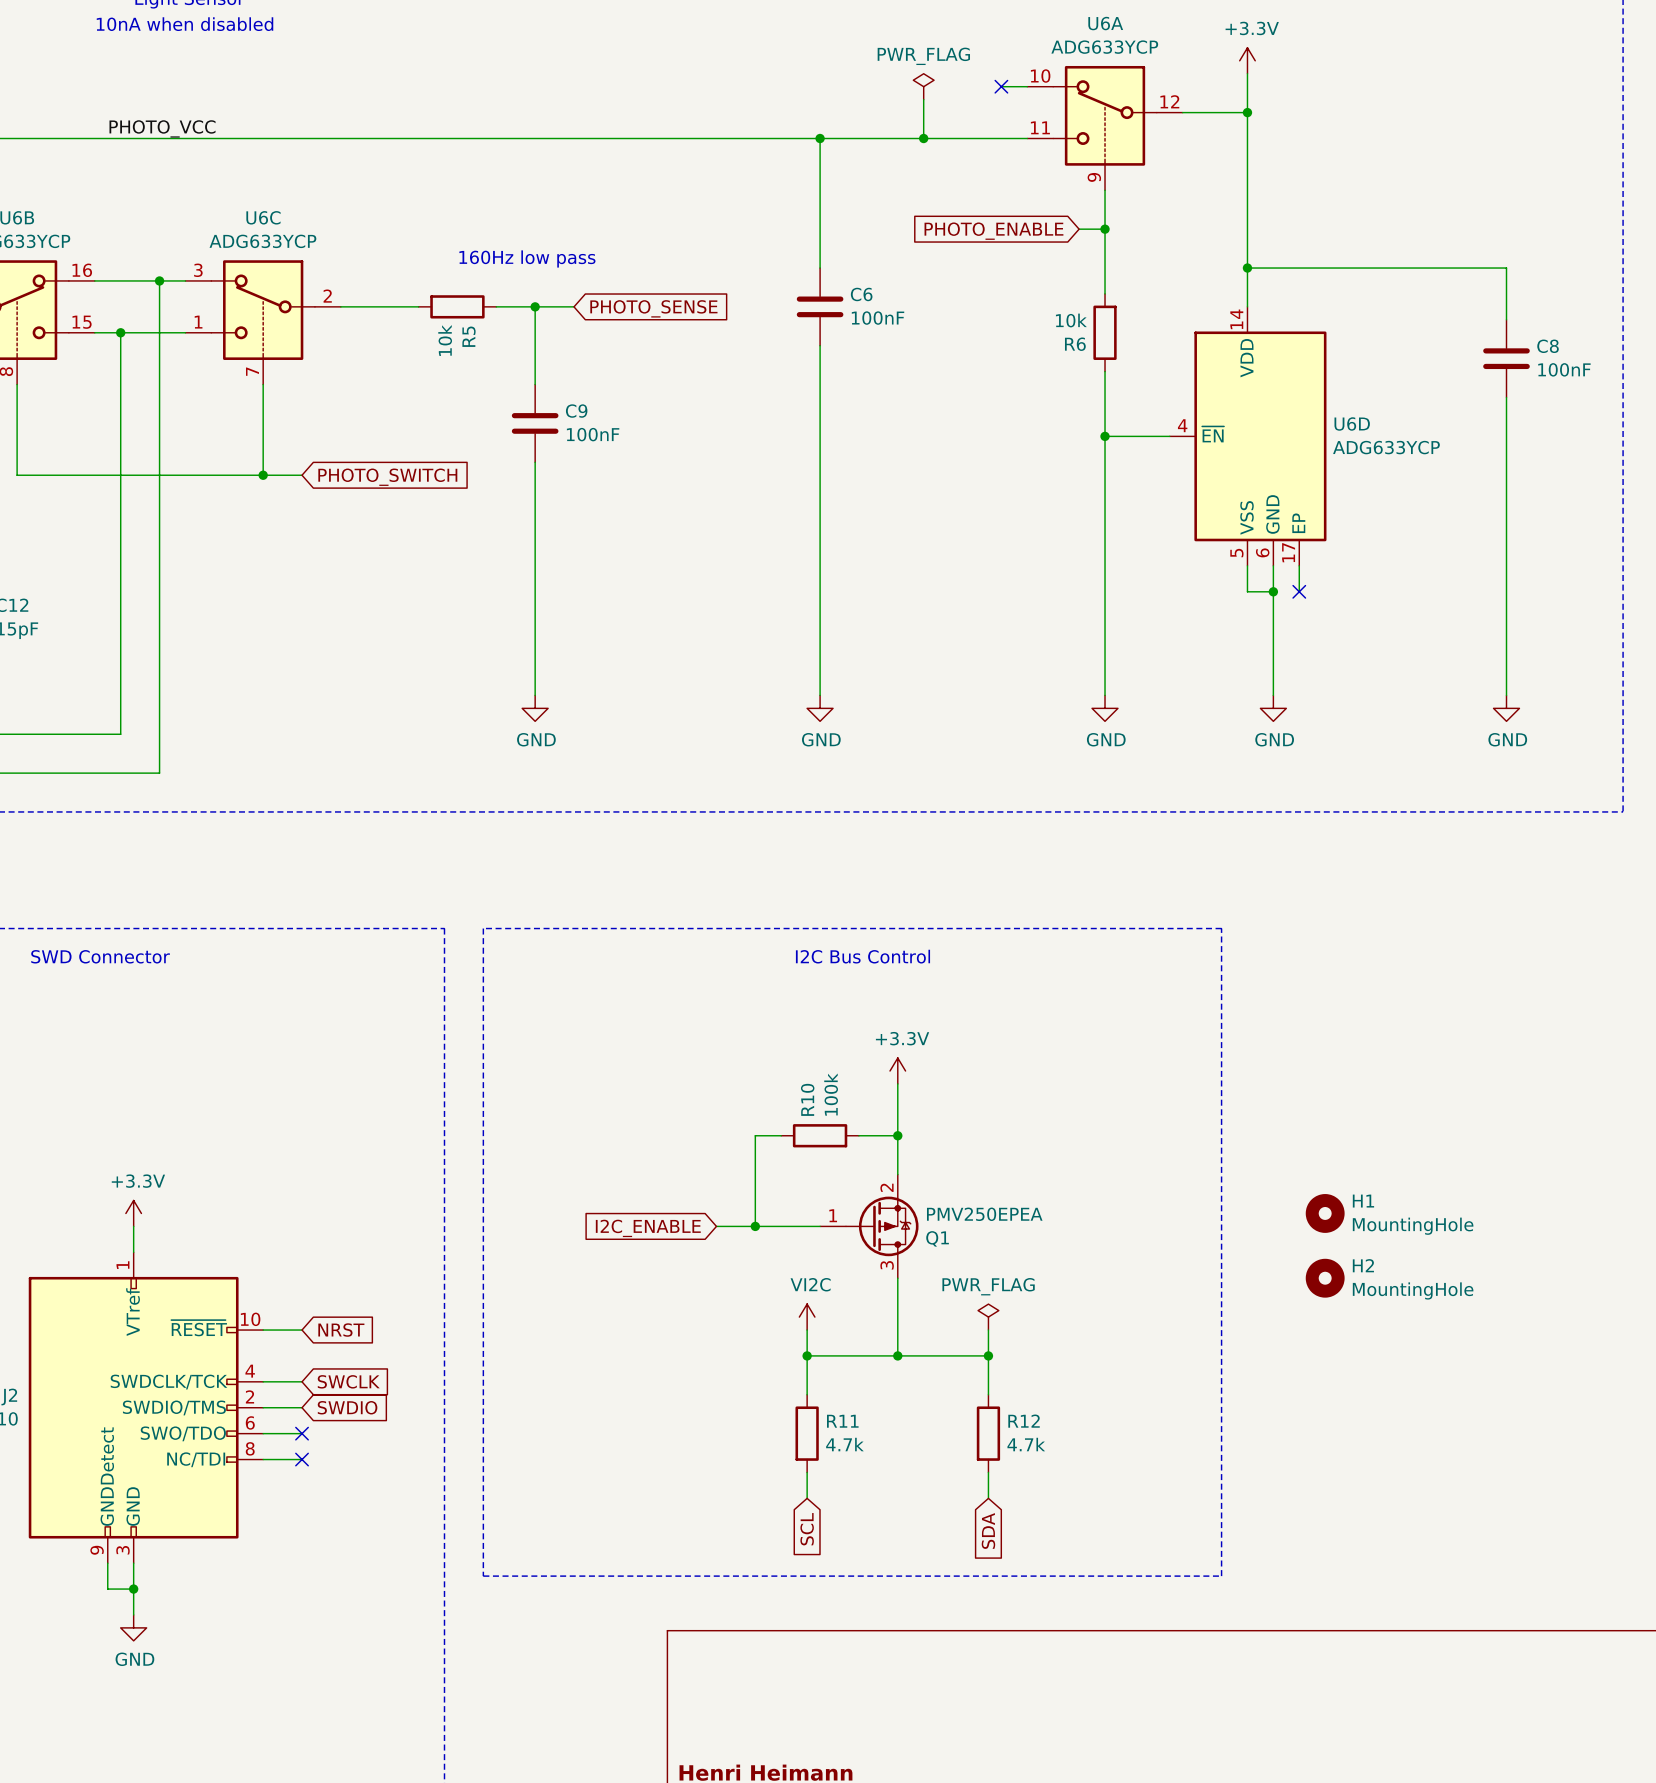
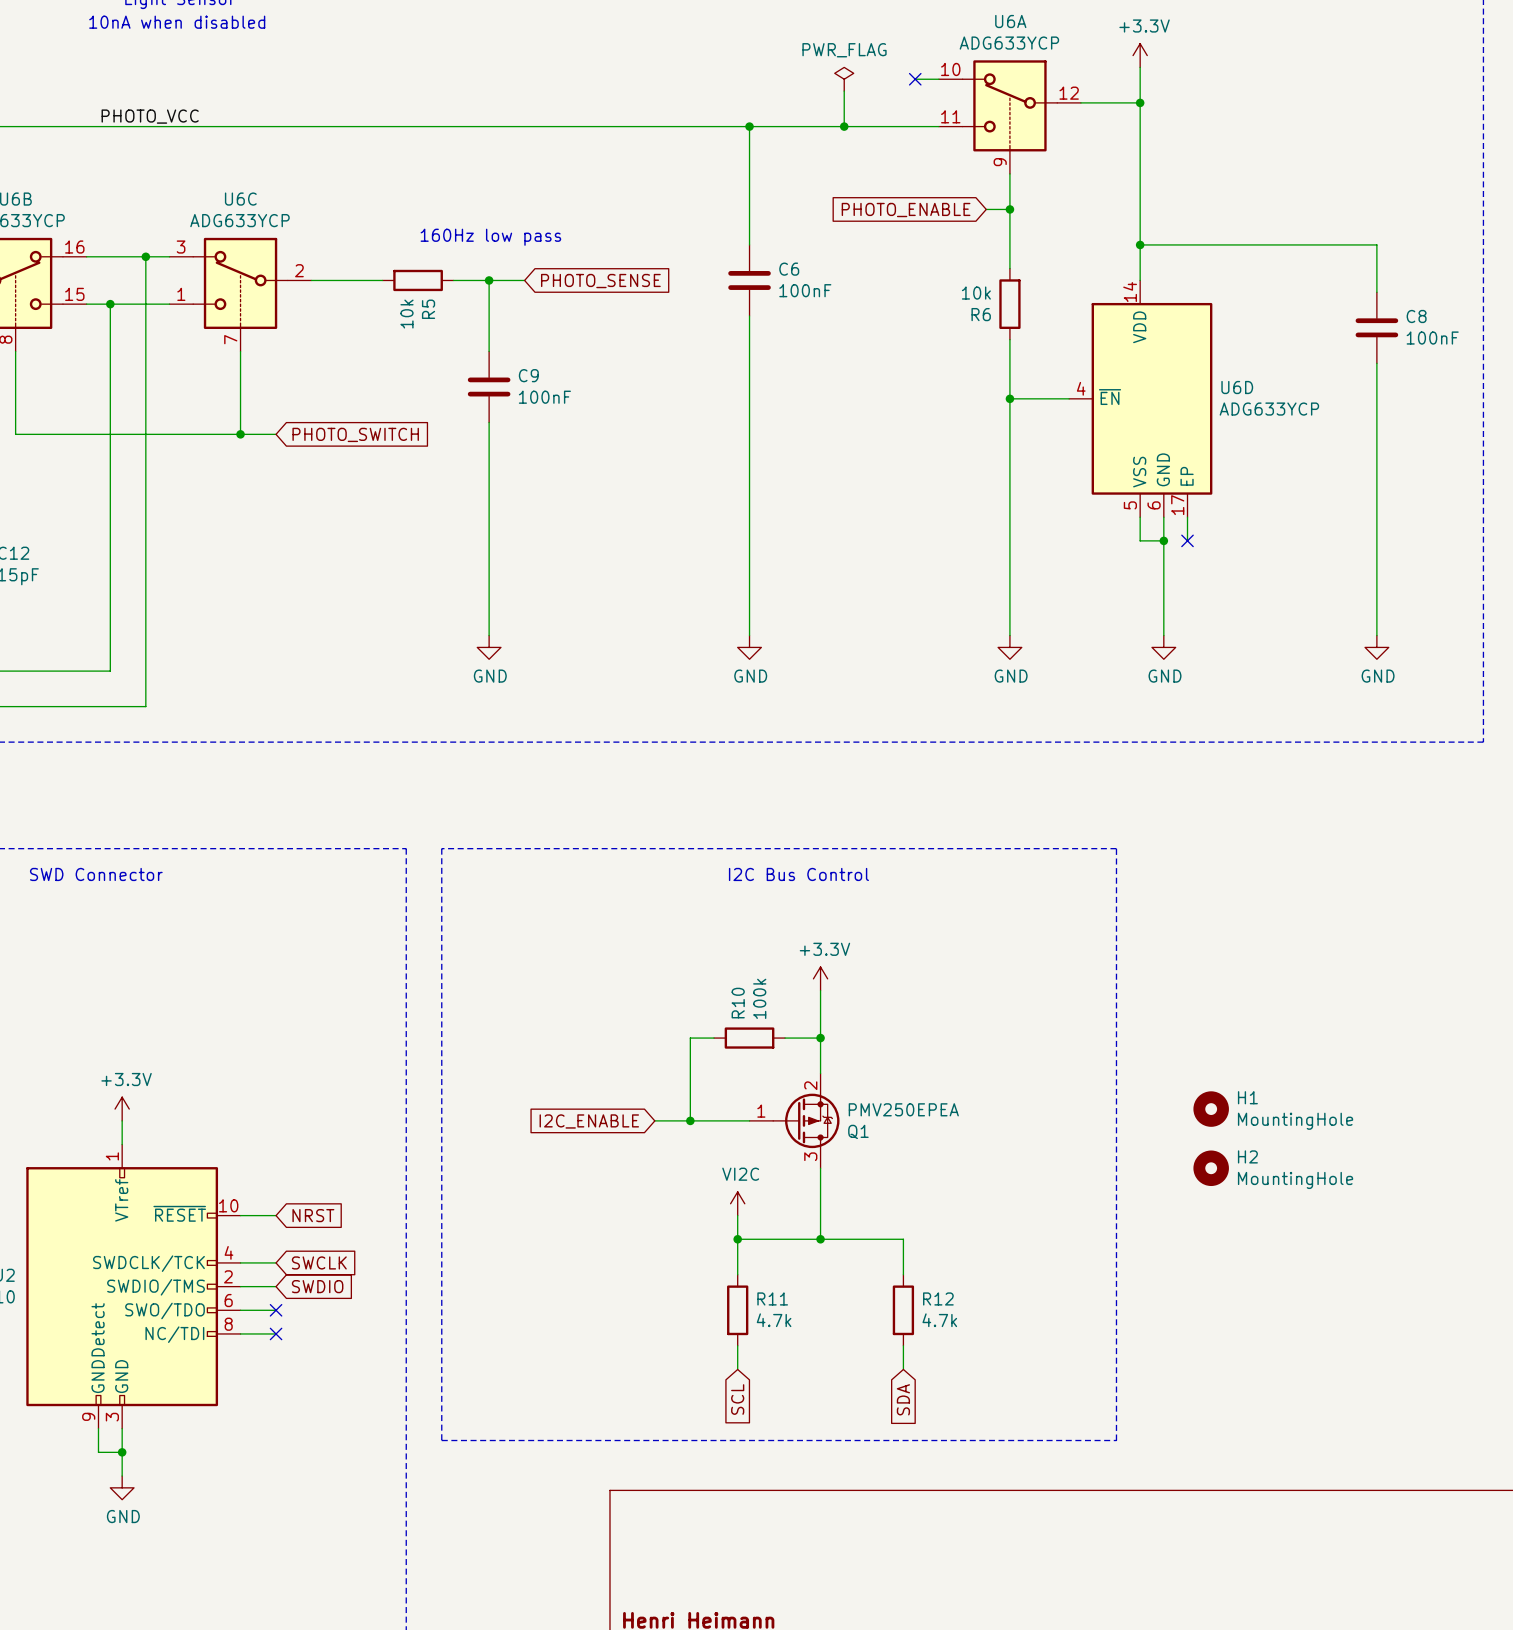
power symbol: PWR_FLAG (988, 1317) -> none
wire: (988, 1330) (988, 1355) -> none
junction: (988, 1355) -> none

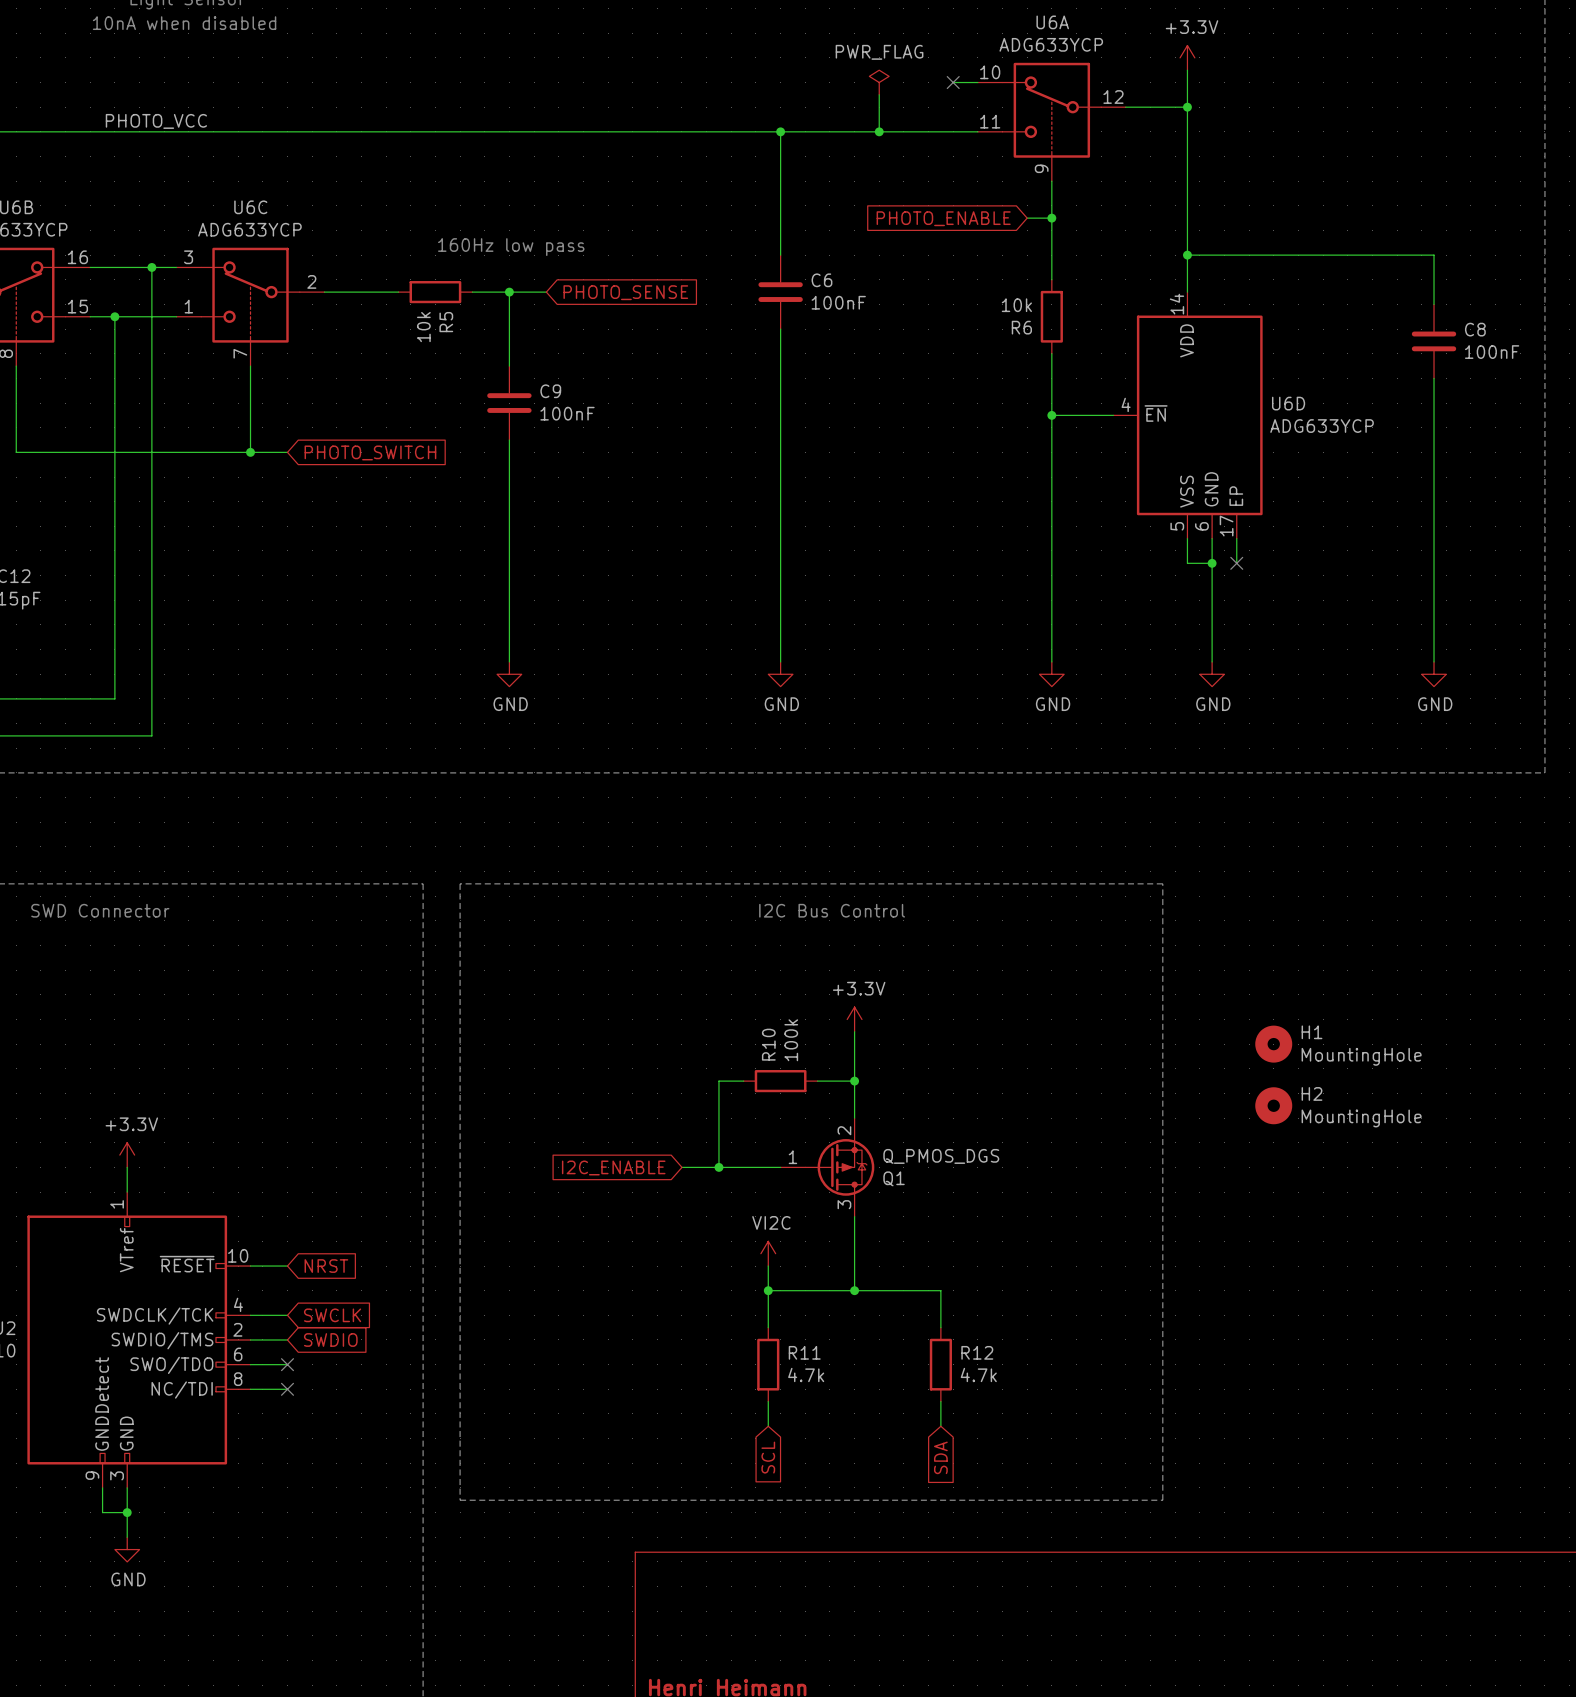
Q1 value: PMV250EPEA (903, 1109) -> Q_PMOS_DGS (941, 1156)
H1 position: (1211, 1109) -> (1273, 1044)
H2 position: (1211, 1168) -> (1273, 1105)

